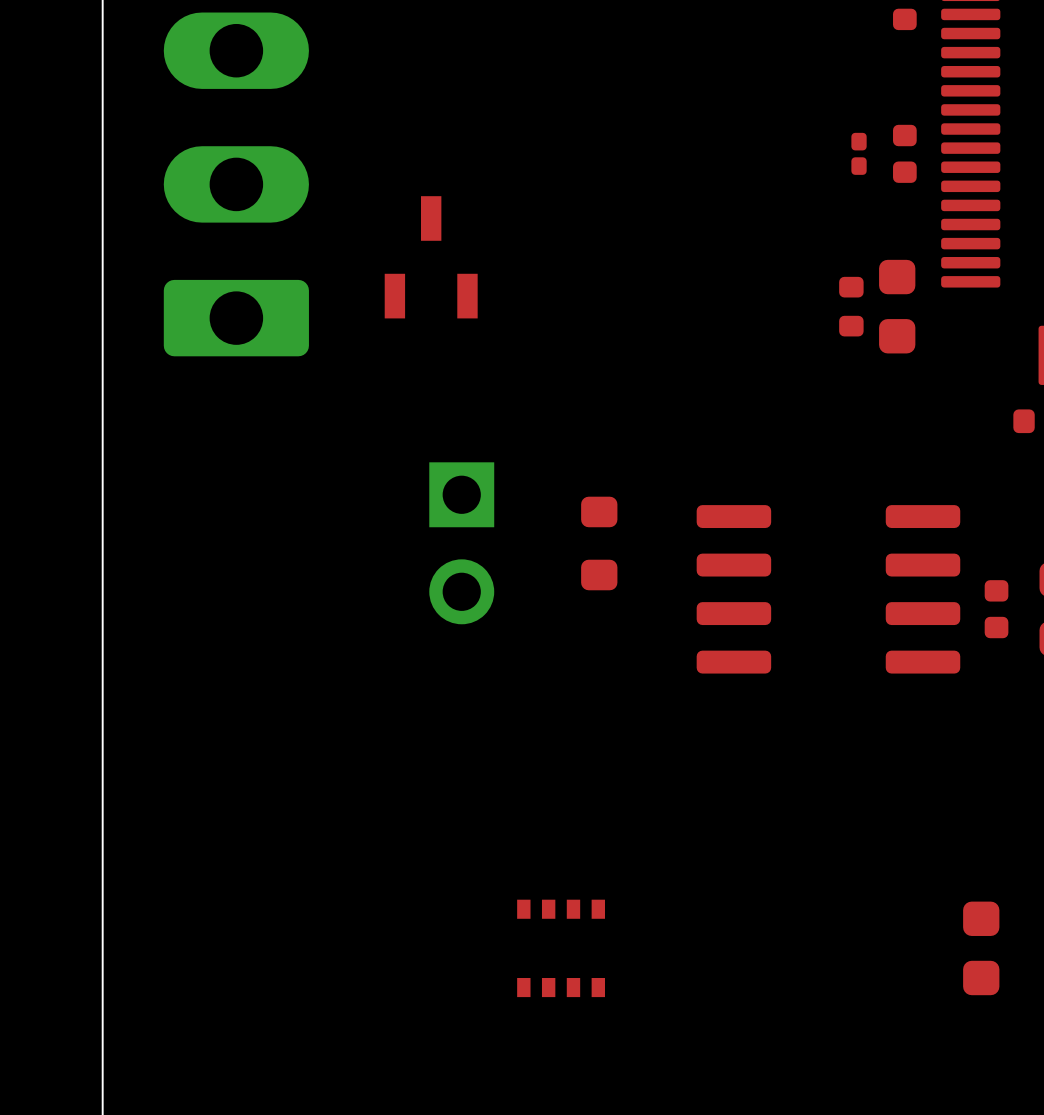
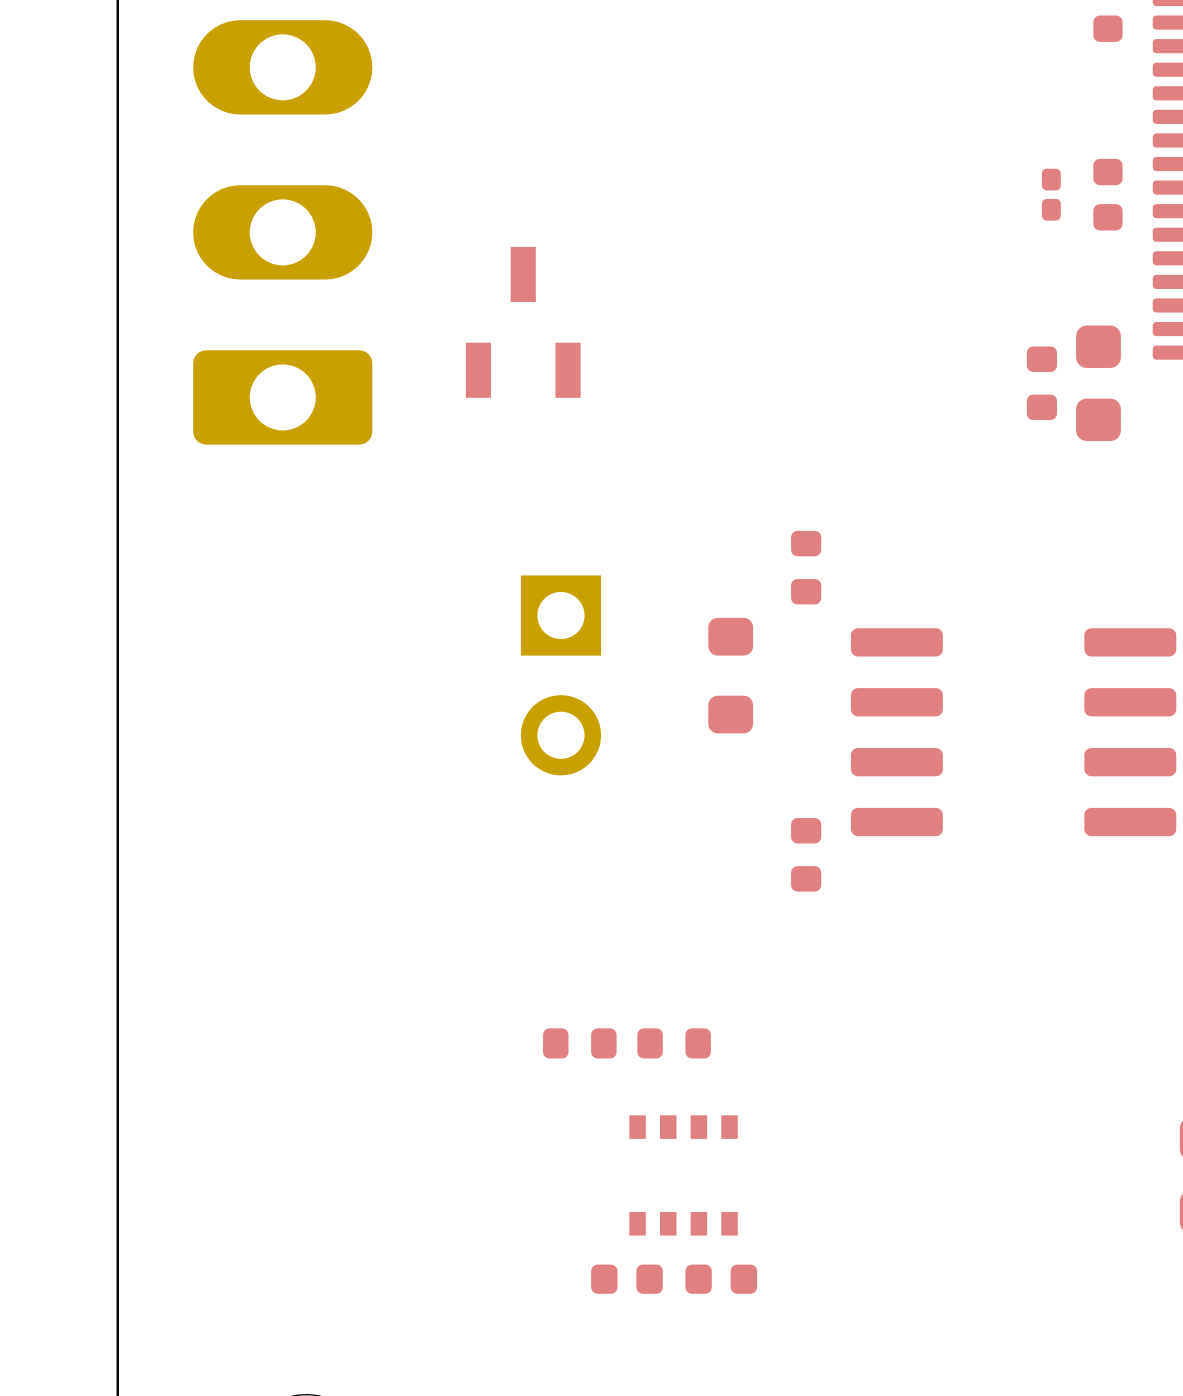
part: none -> (806, 567)
part: none -> (806, 854)
part: none -> (579, 1043)
part: none -> (674, 1043)
part: none -> (626, 1279)
part: none -> (721, 1279)

